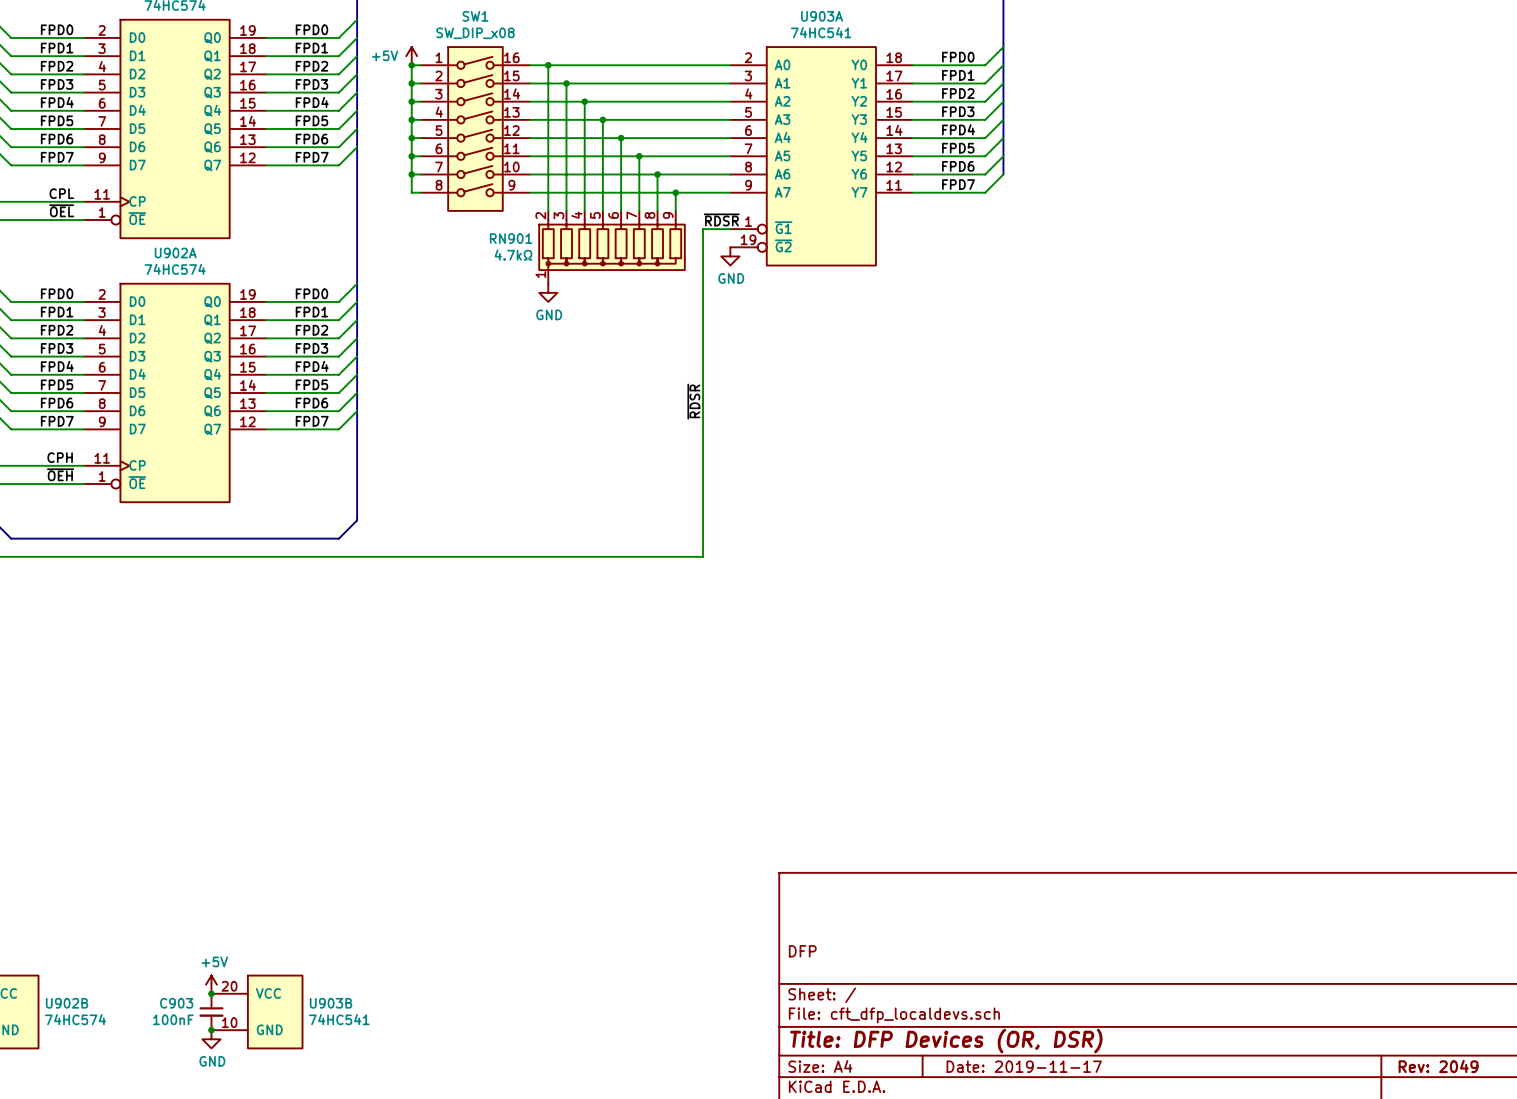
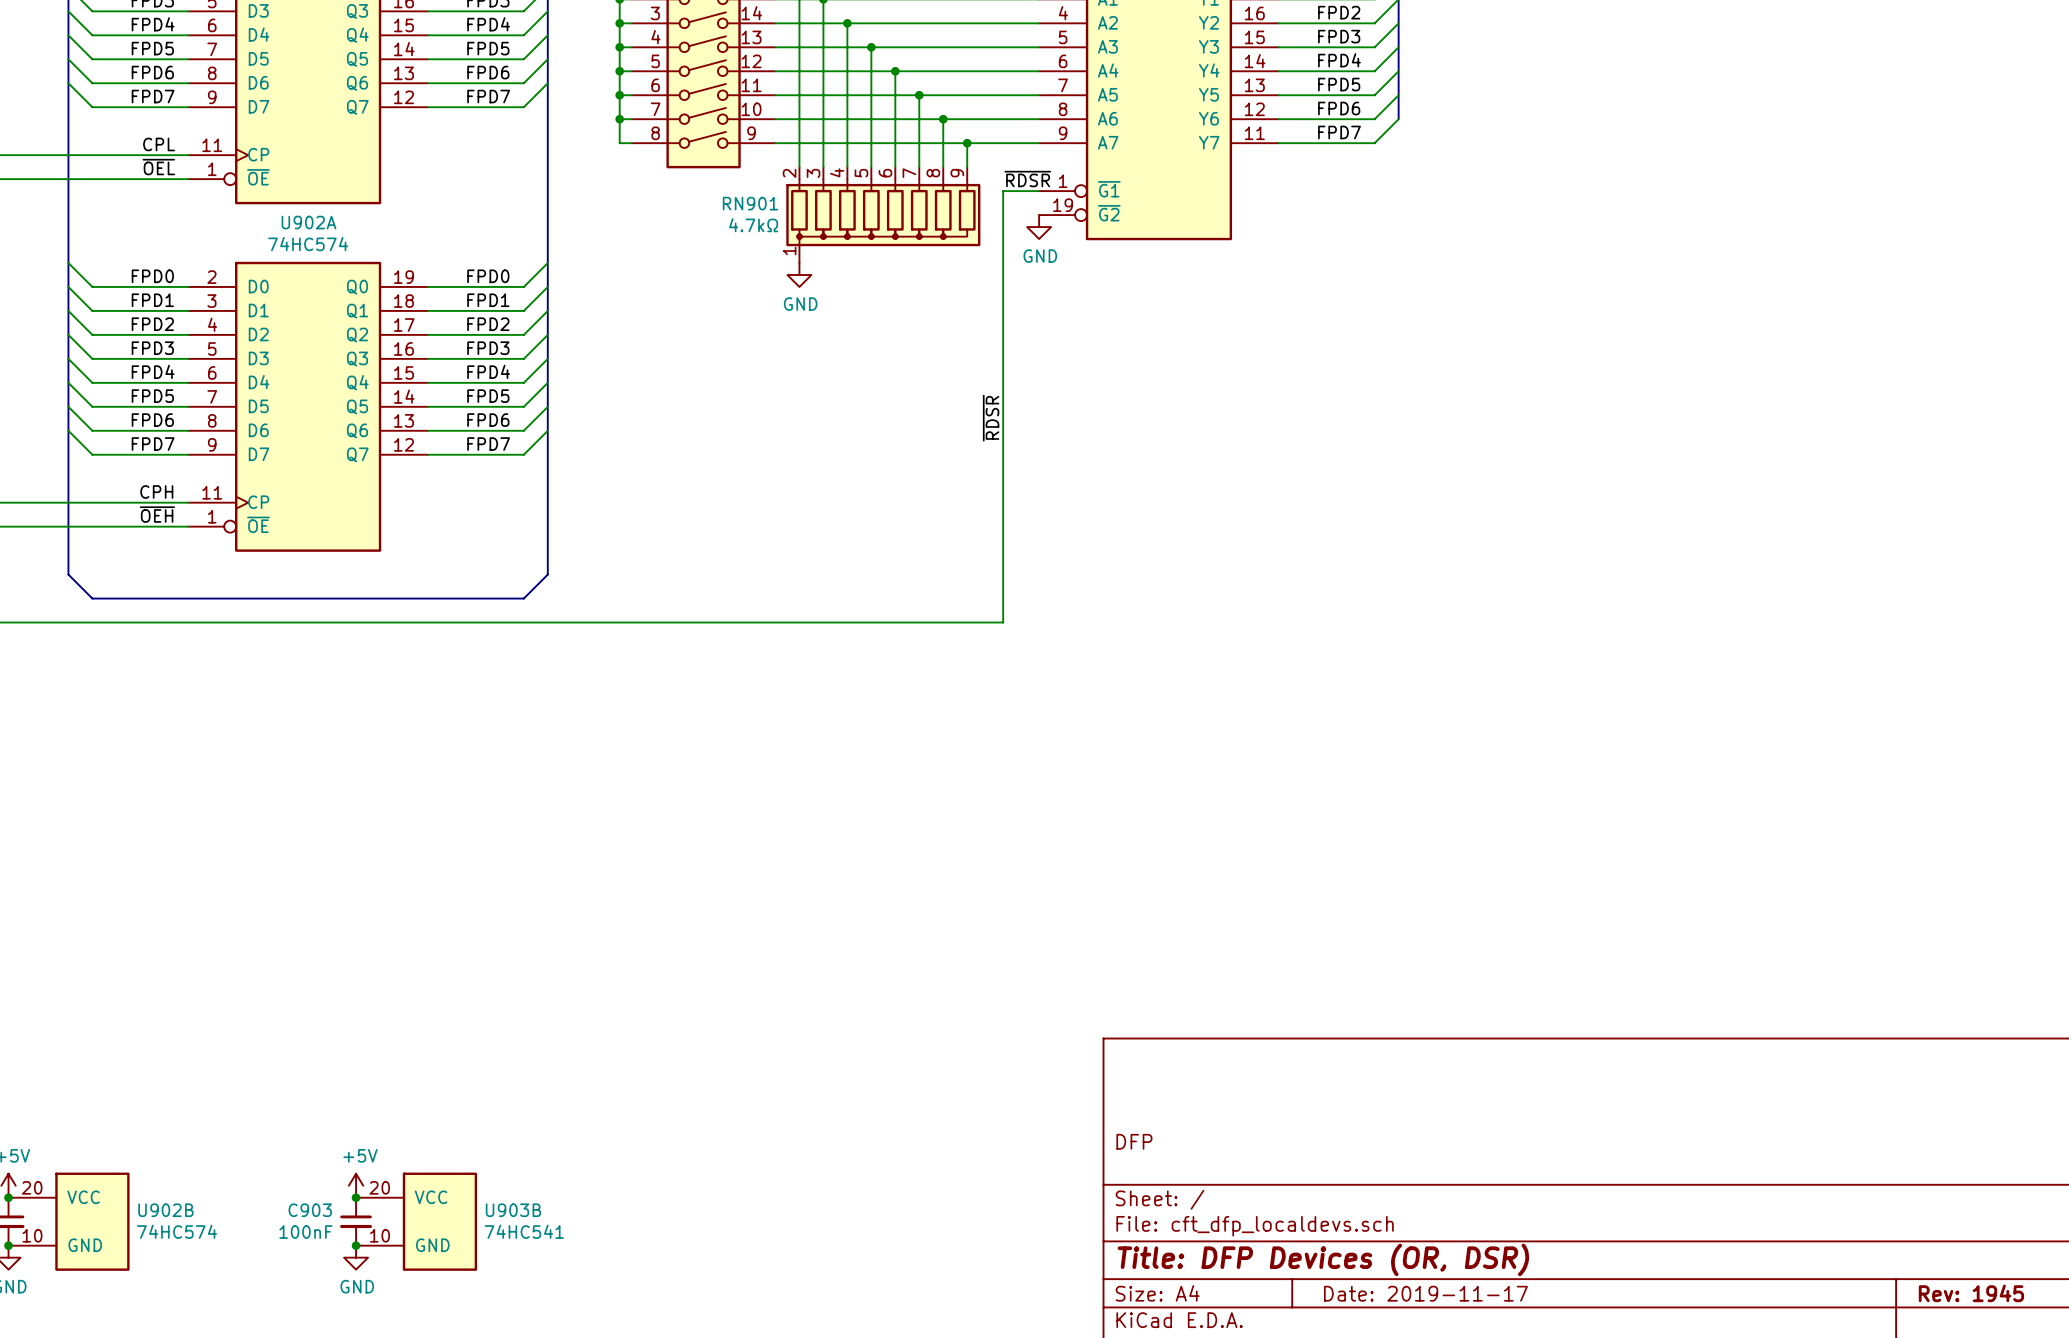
title block: Rev: 2049 (1438, 1066) -> Rev: 1945 (1971, 1293)

